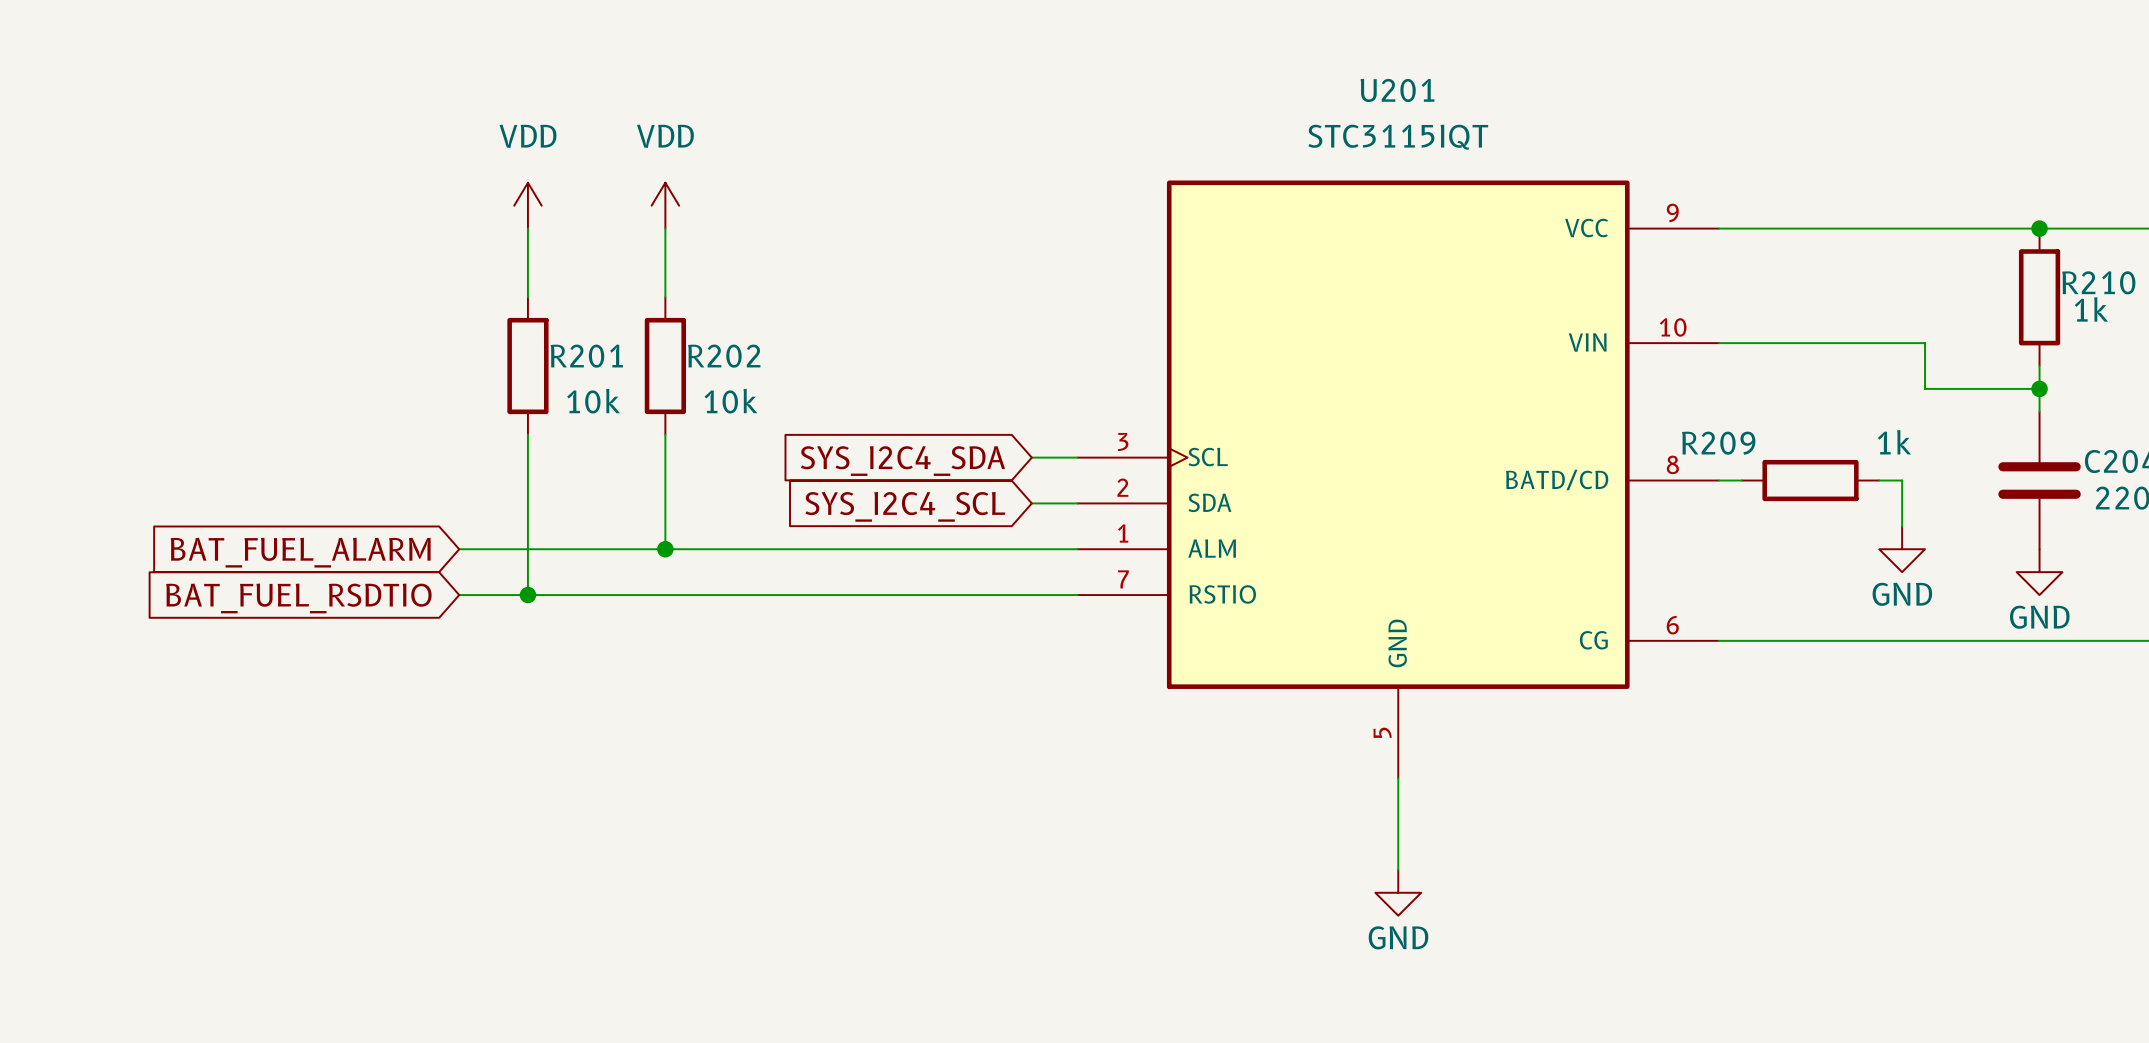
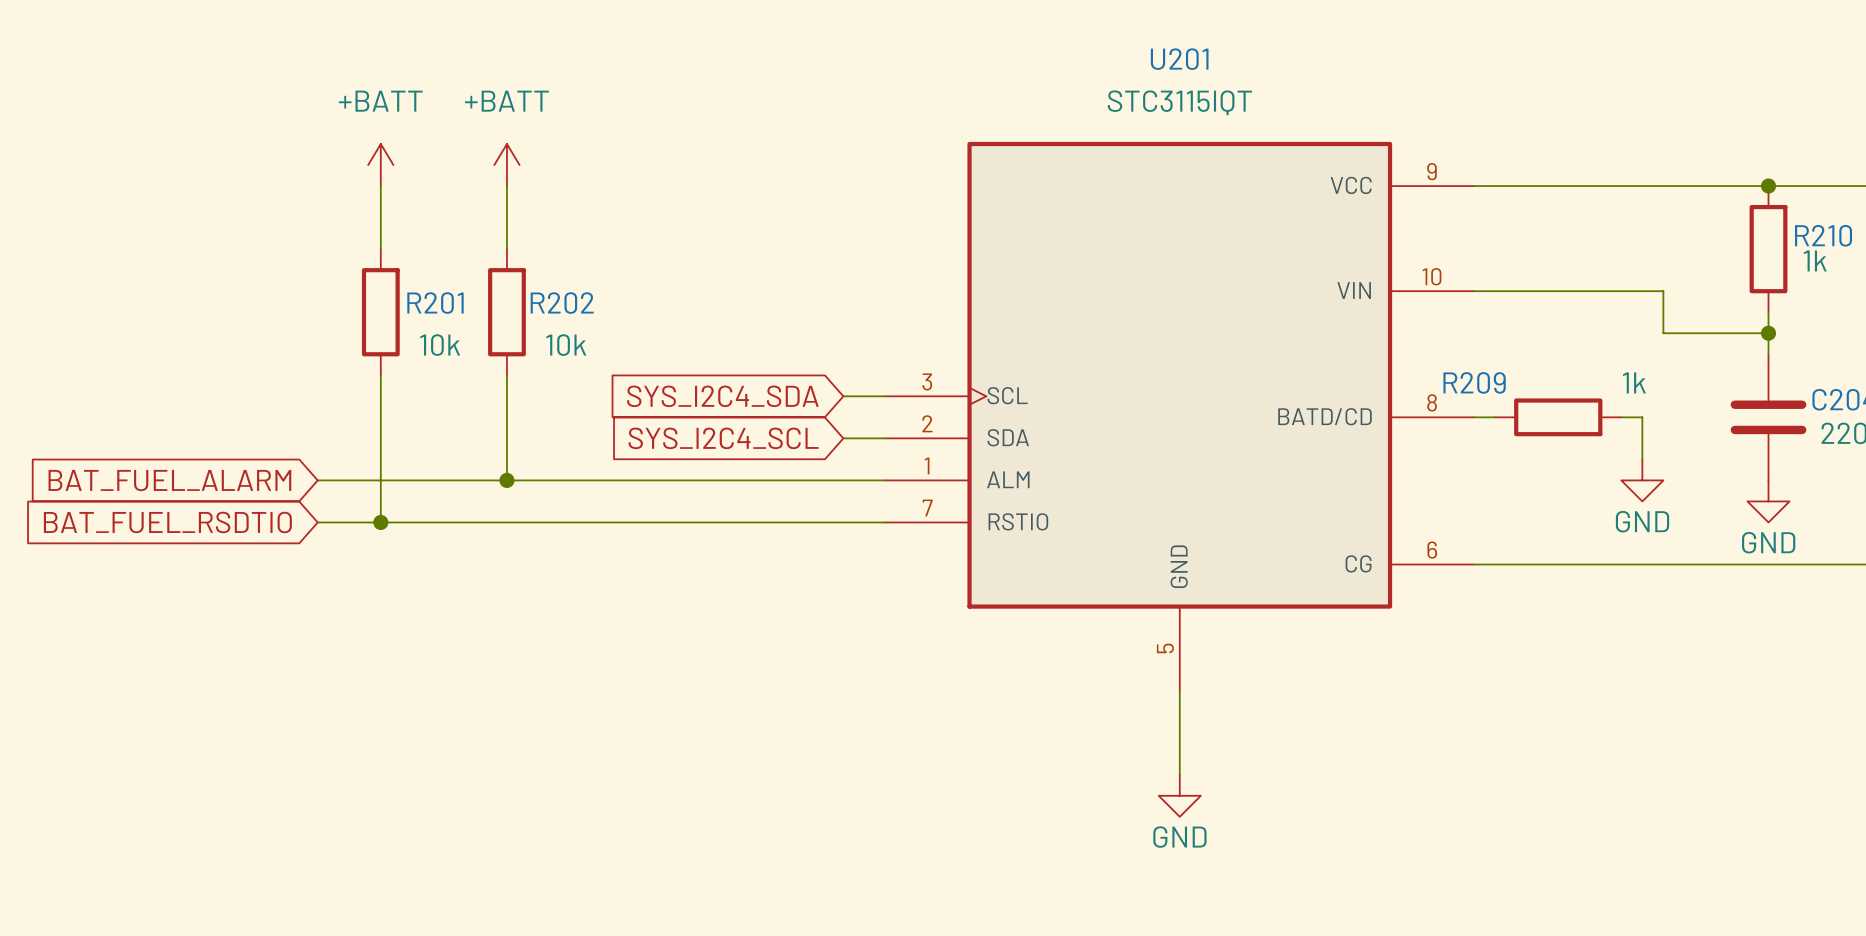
power symbol: VDD (527, 205) -> +BATT (380, 165)
power symbol: VDD (665, 205) -> +BATT (506, 165)

